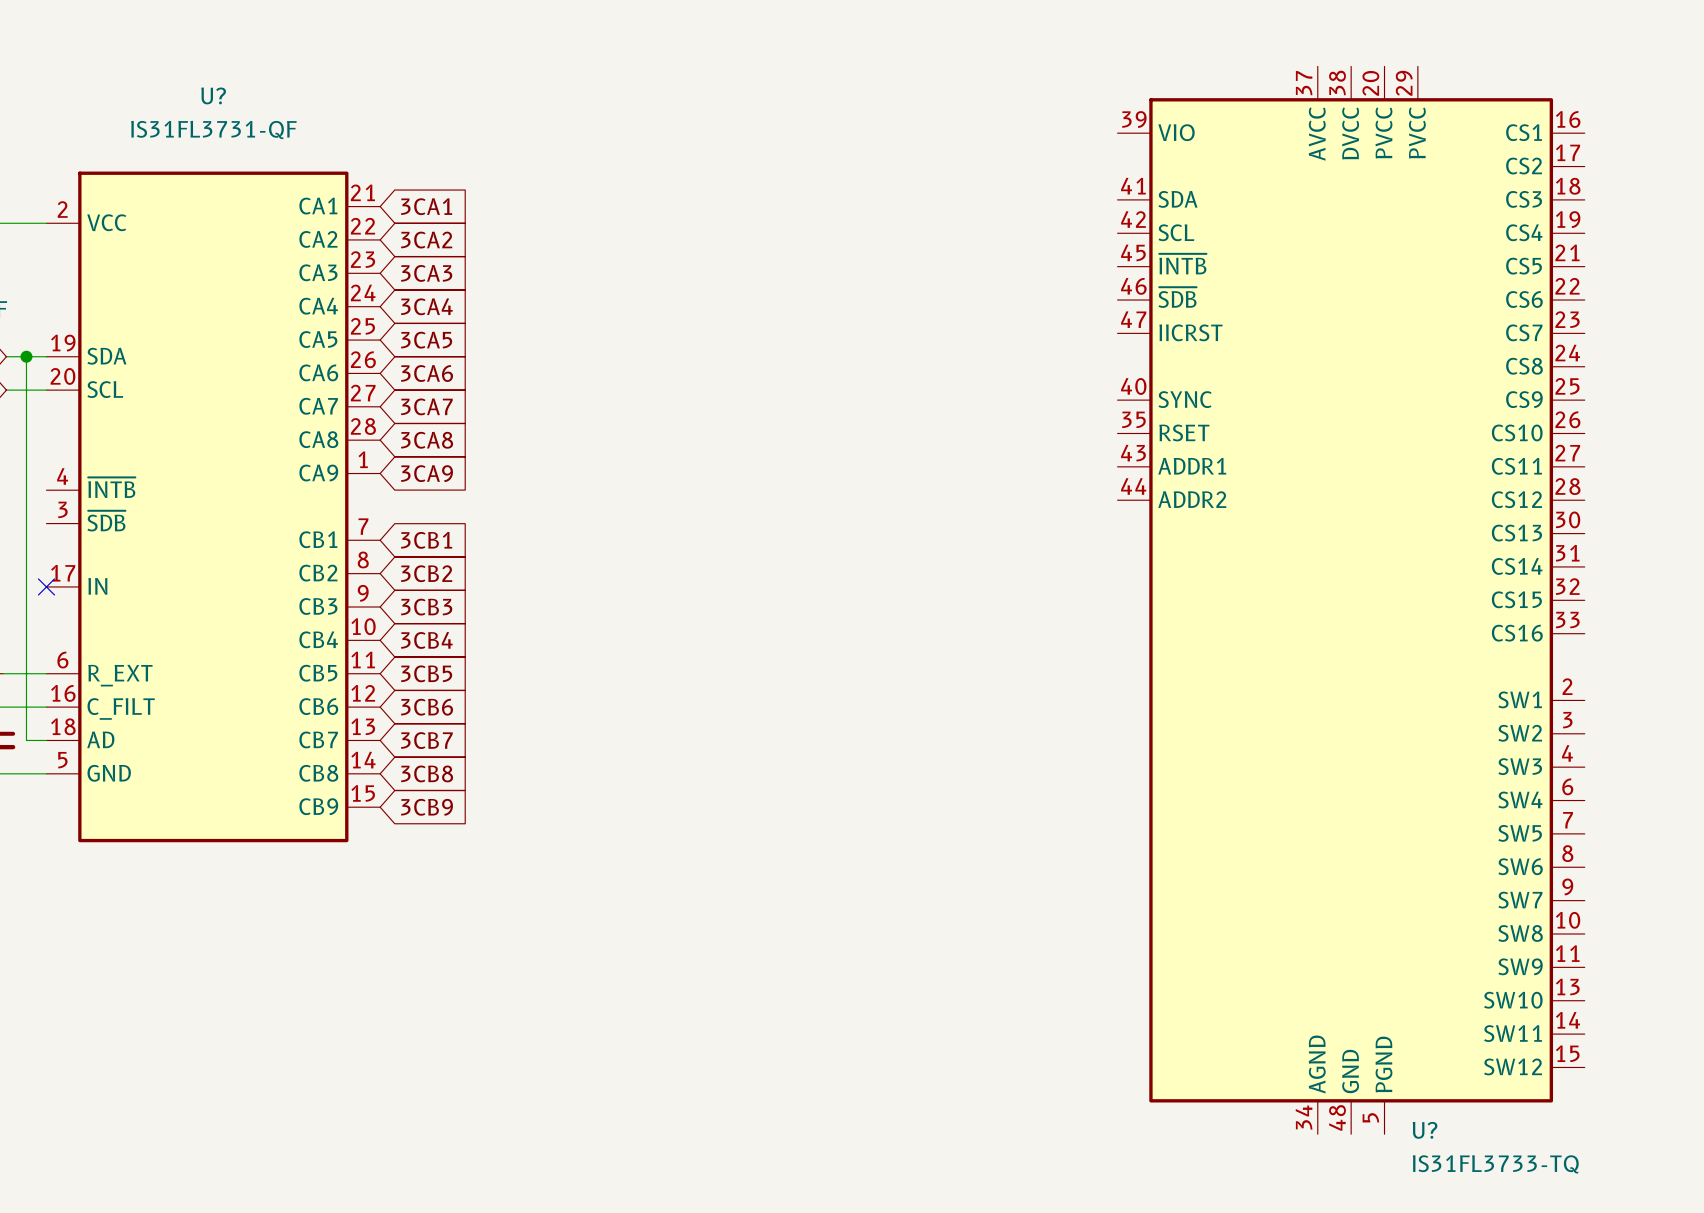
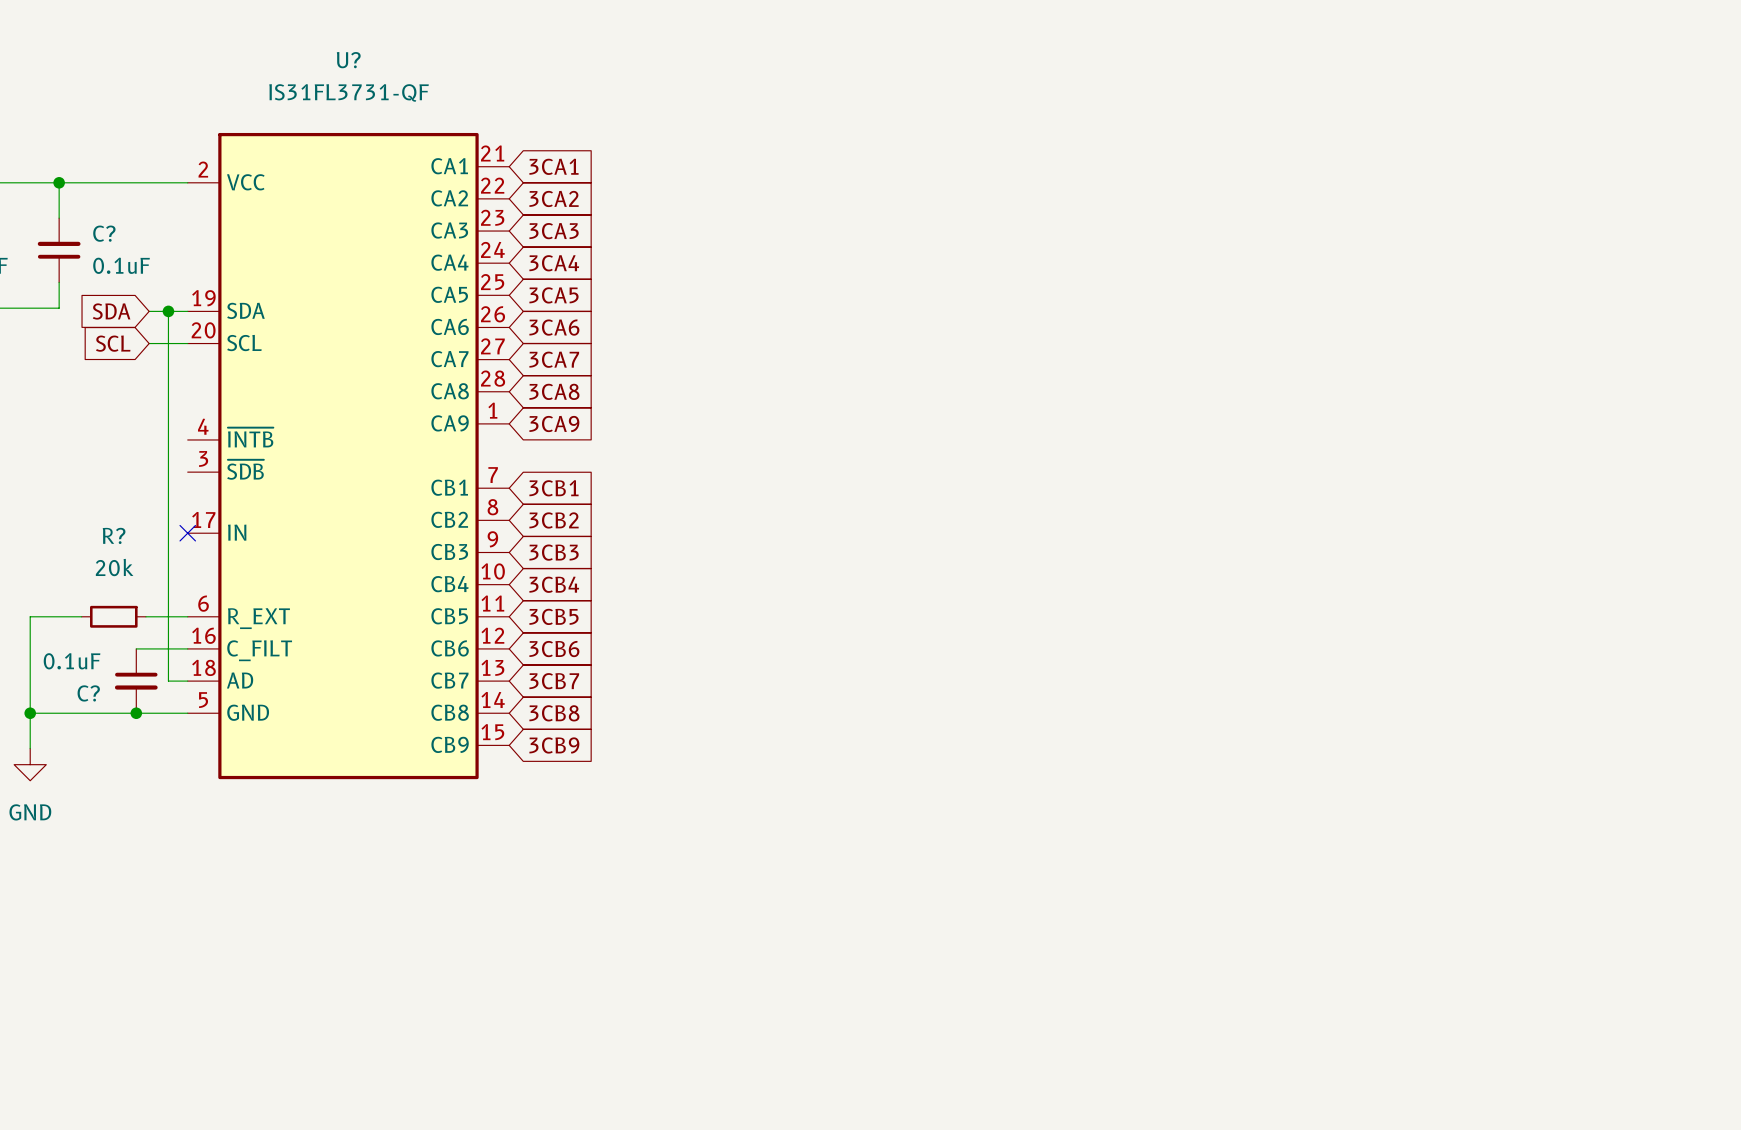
U?: IS31FL3733-TQ (1351, 600) -> none

